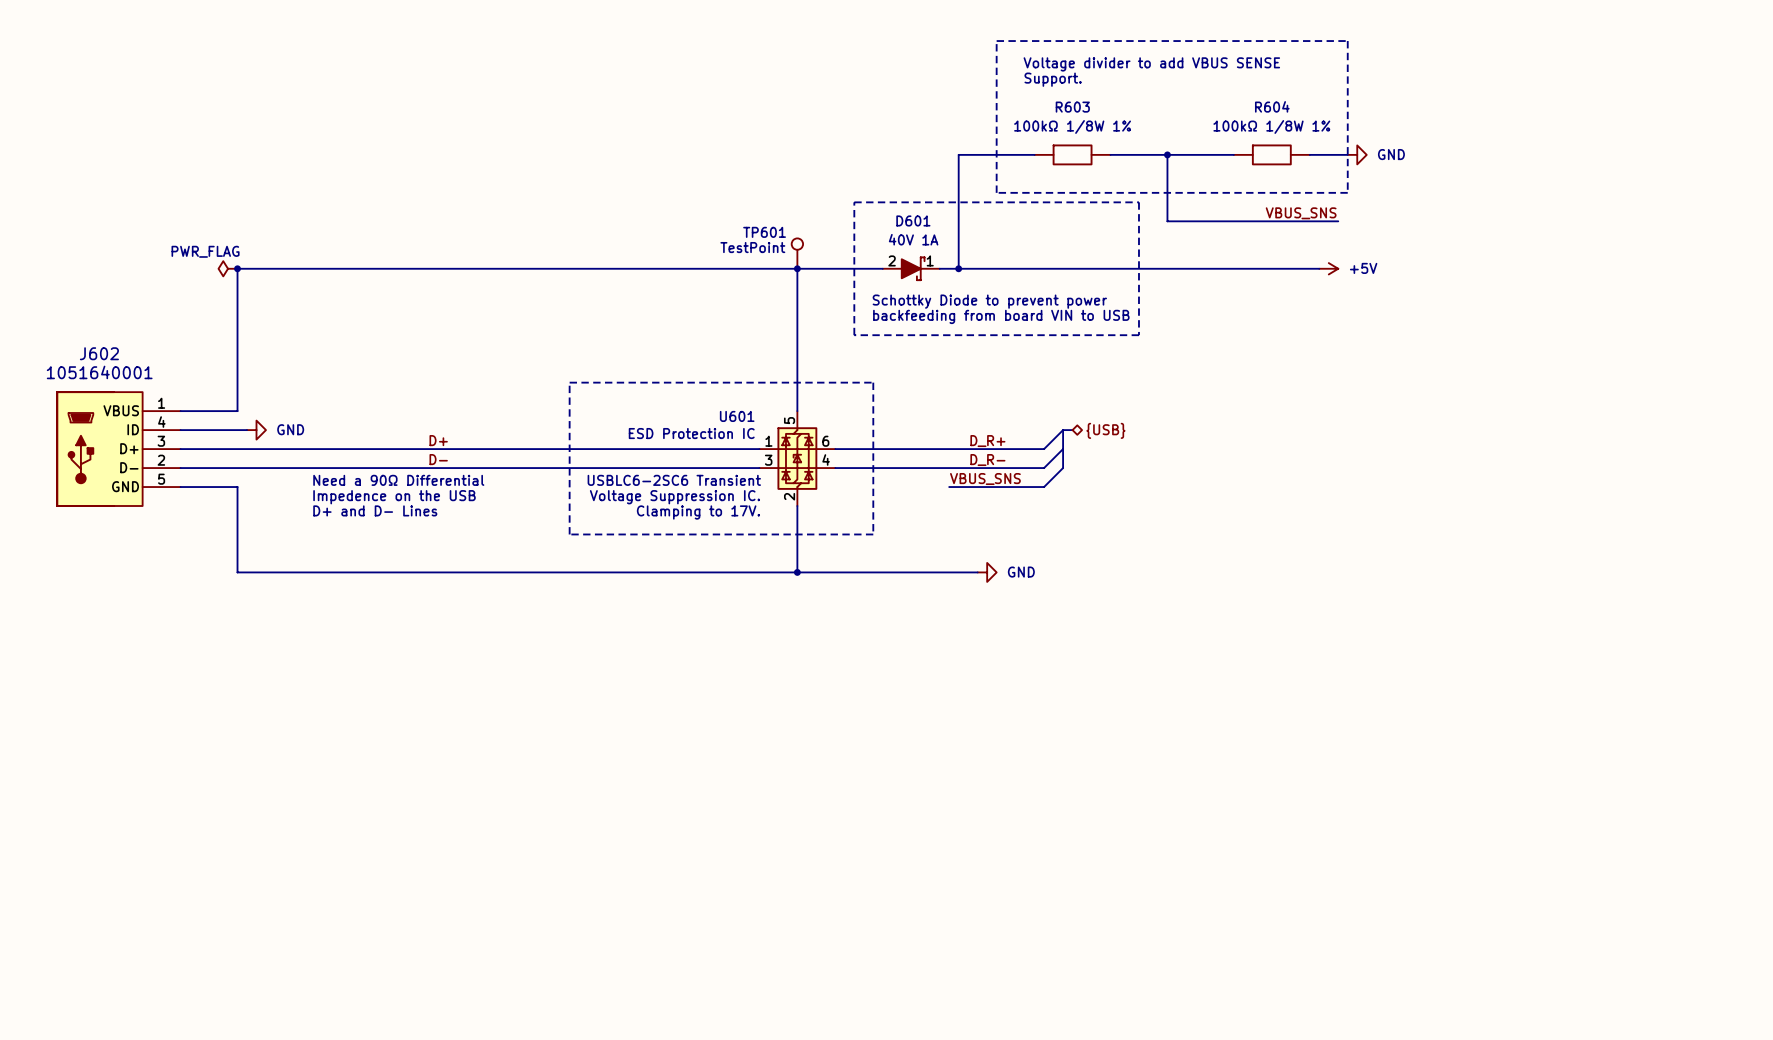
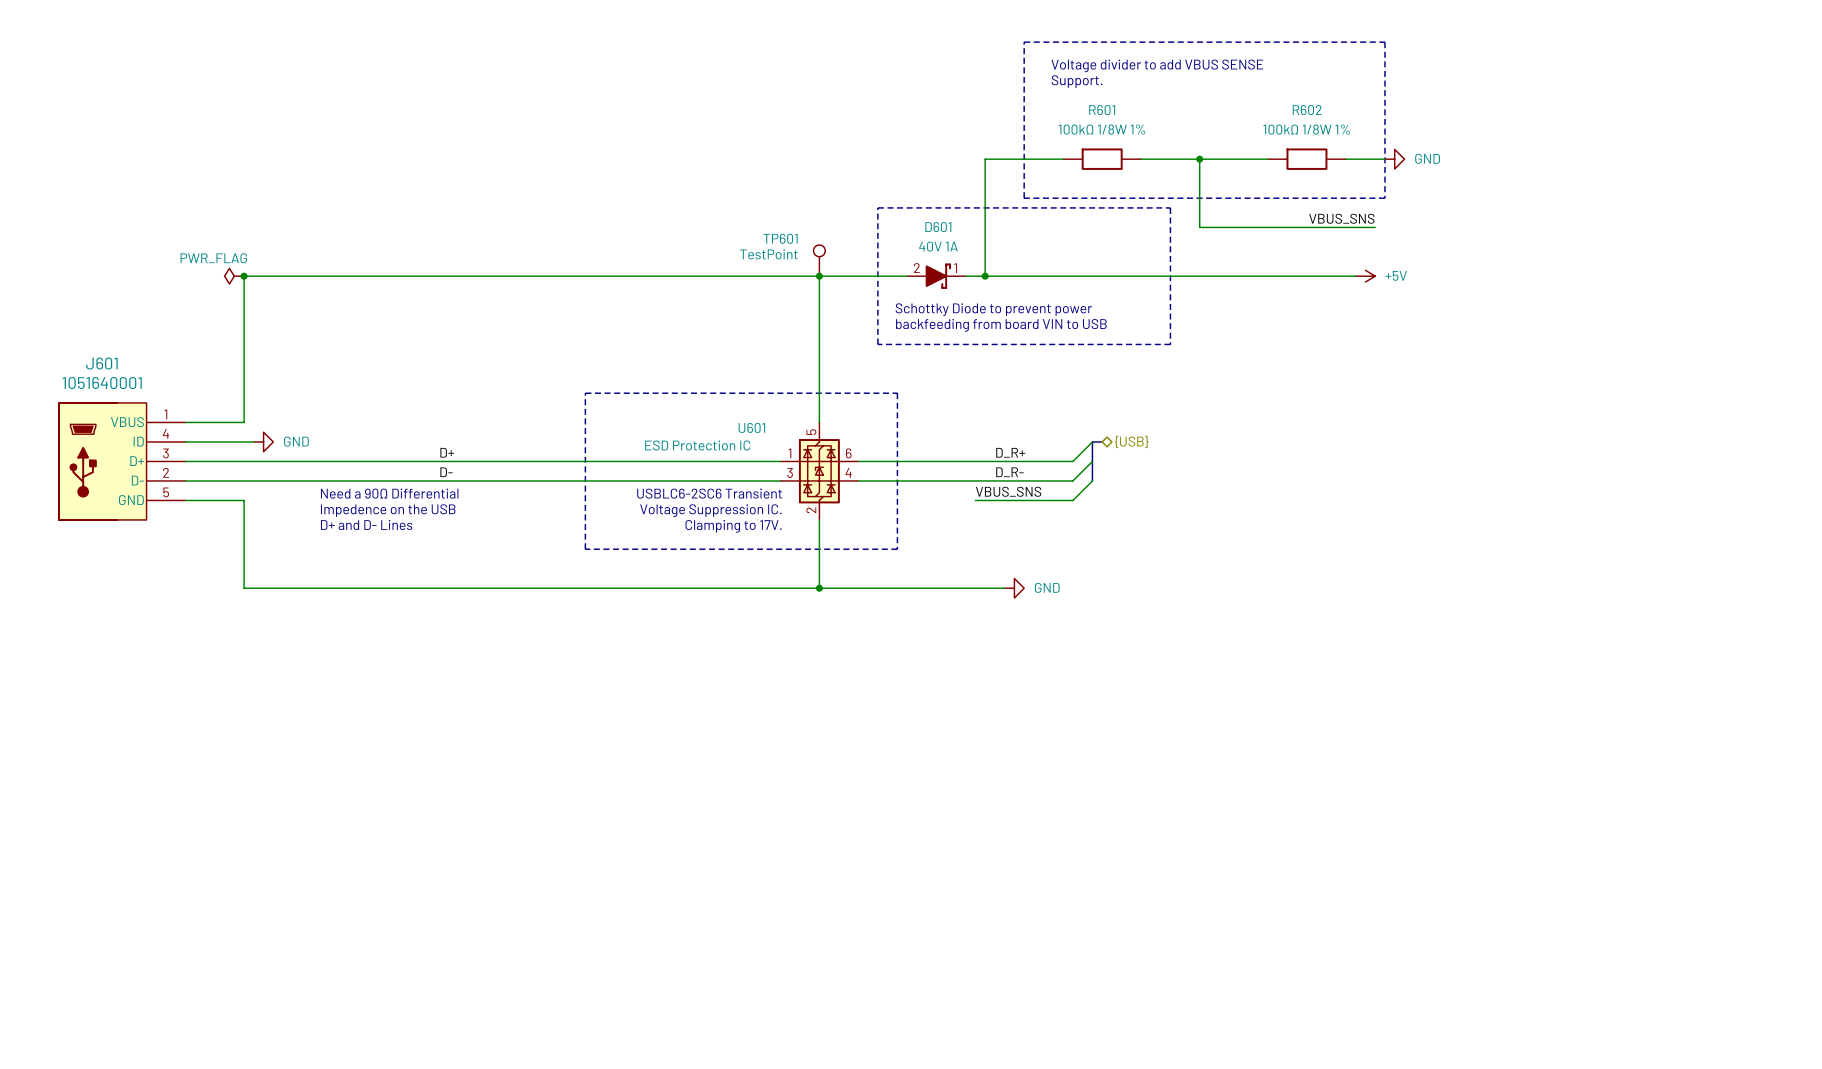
R604 name: R604 (1272, 106) -> R602 (1307, 110)
R603 name: R603 (1072, 107) -> R601 (1102, 110)
J602 name: J602 (99, 353) -> J601 (101, 363)

